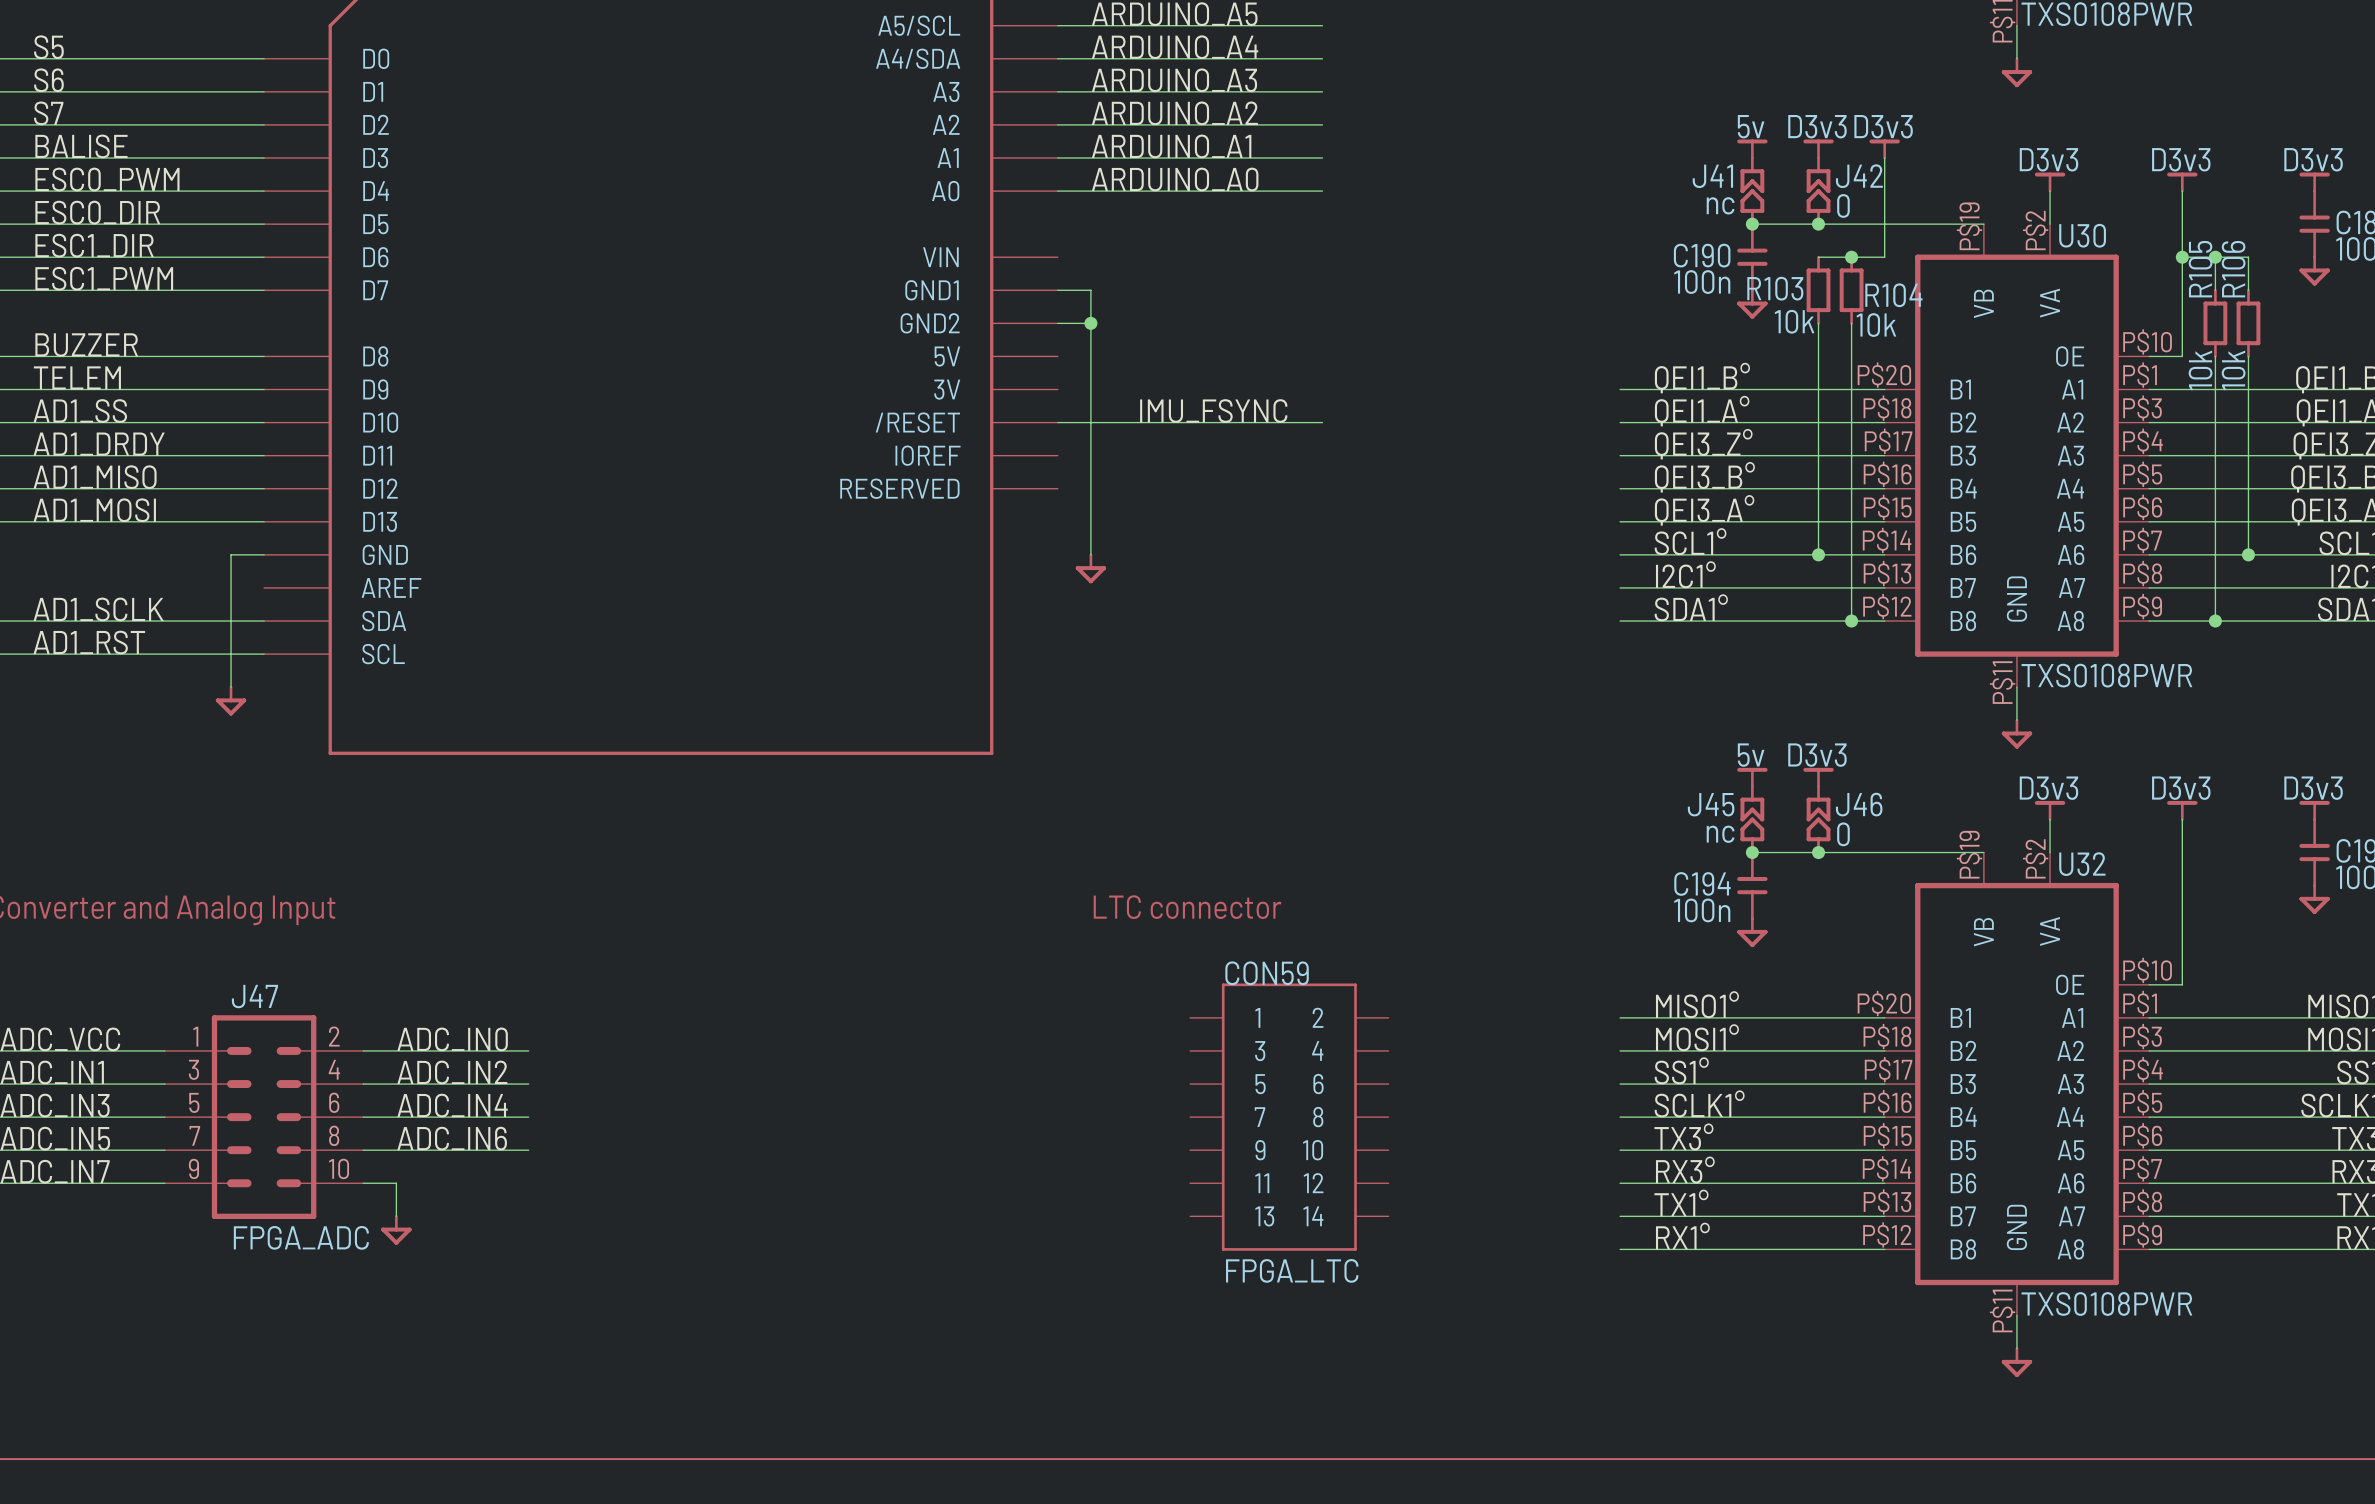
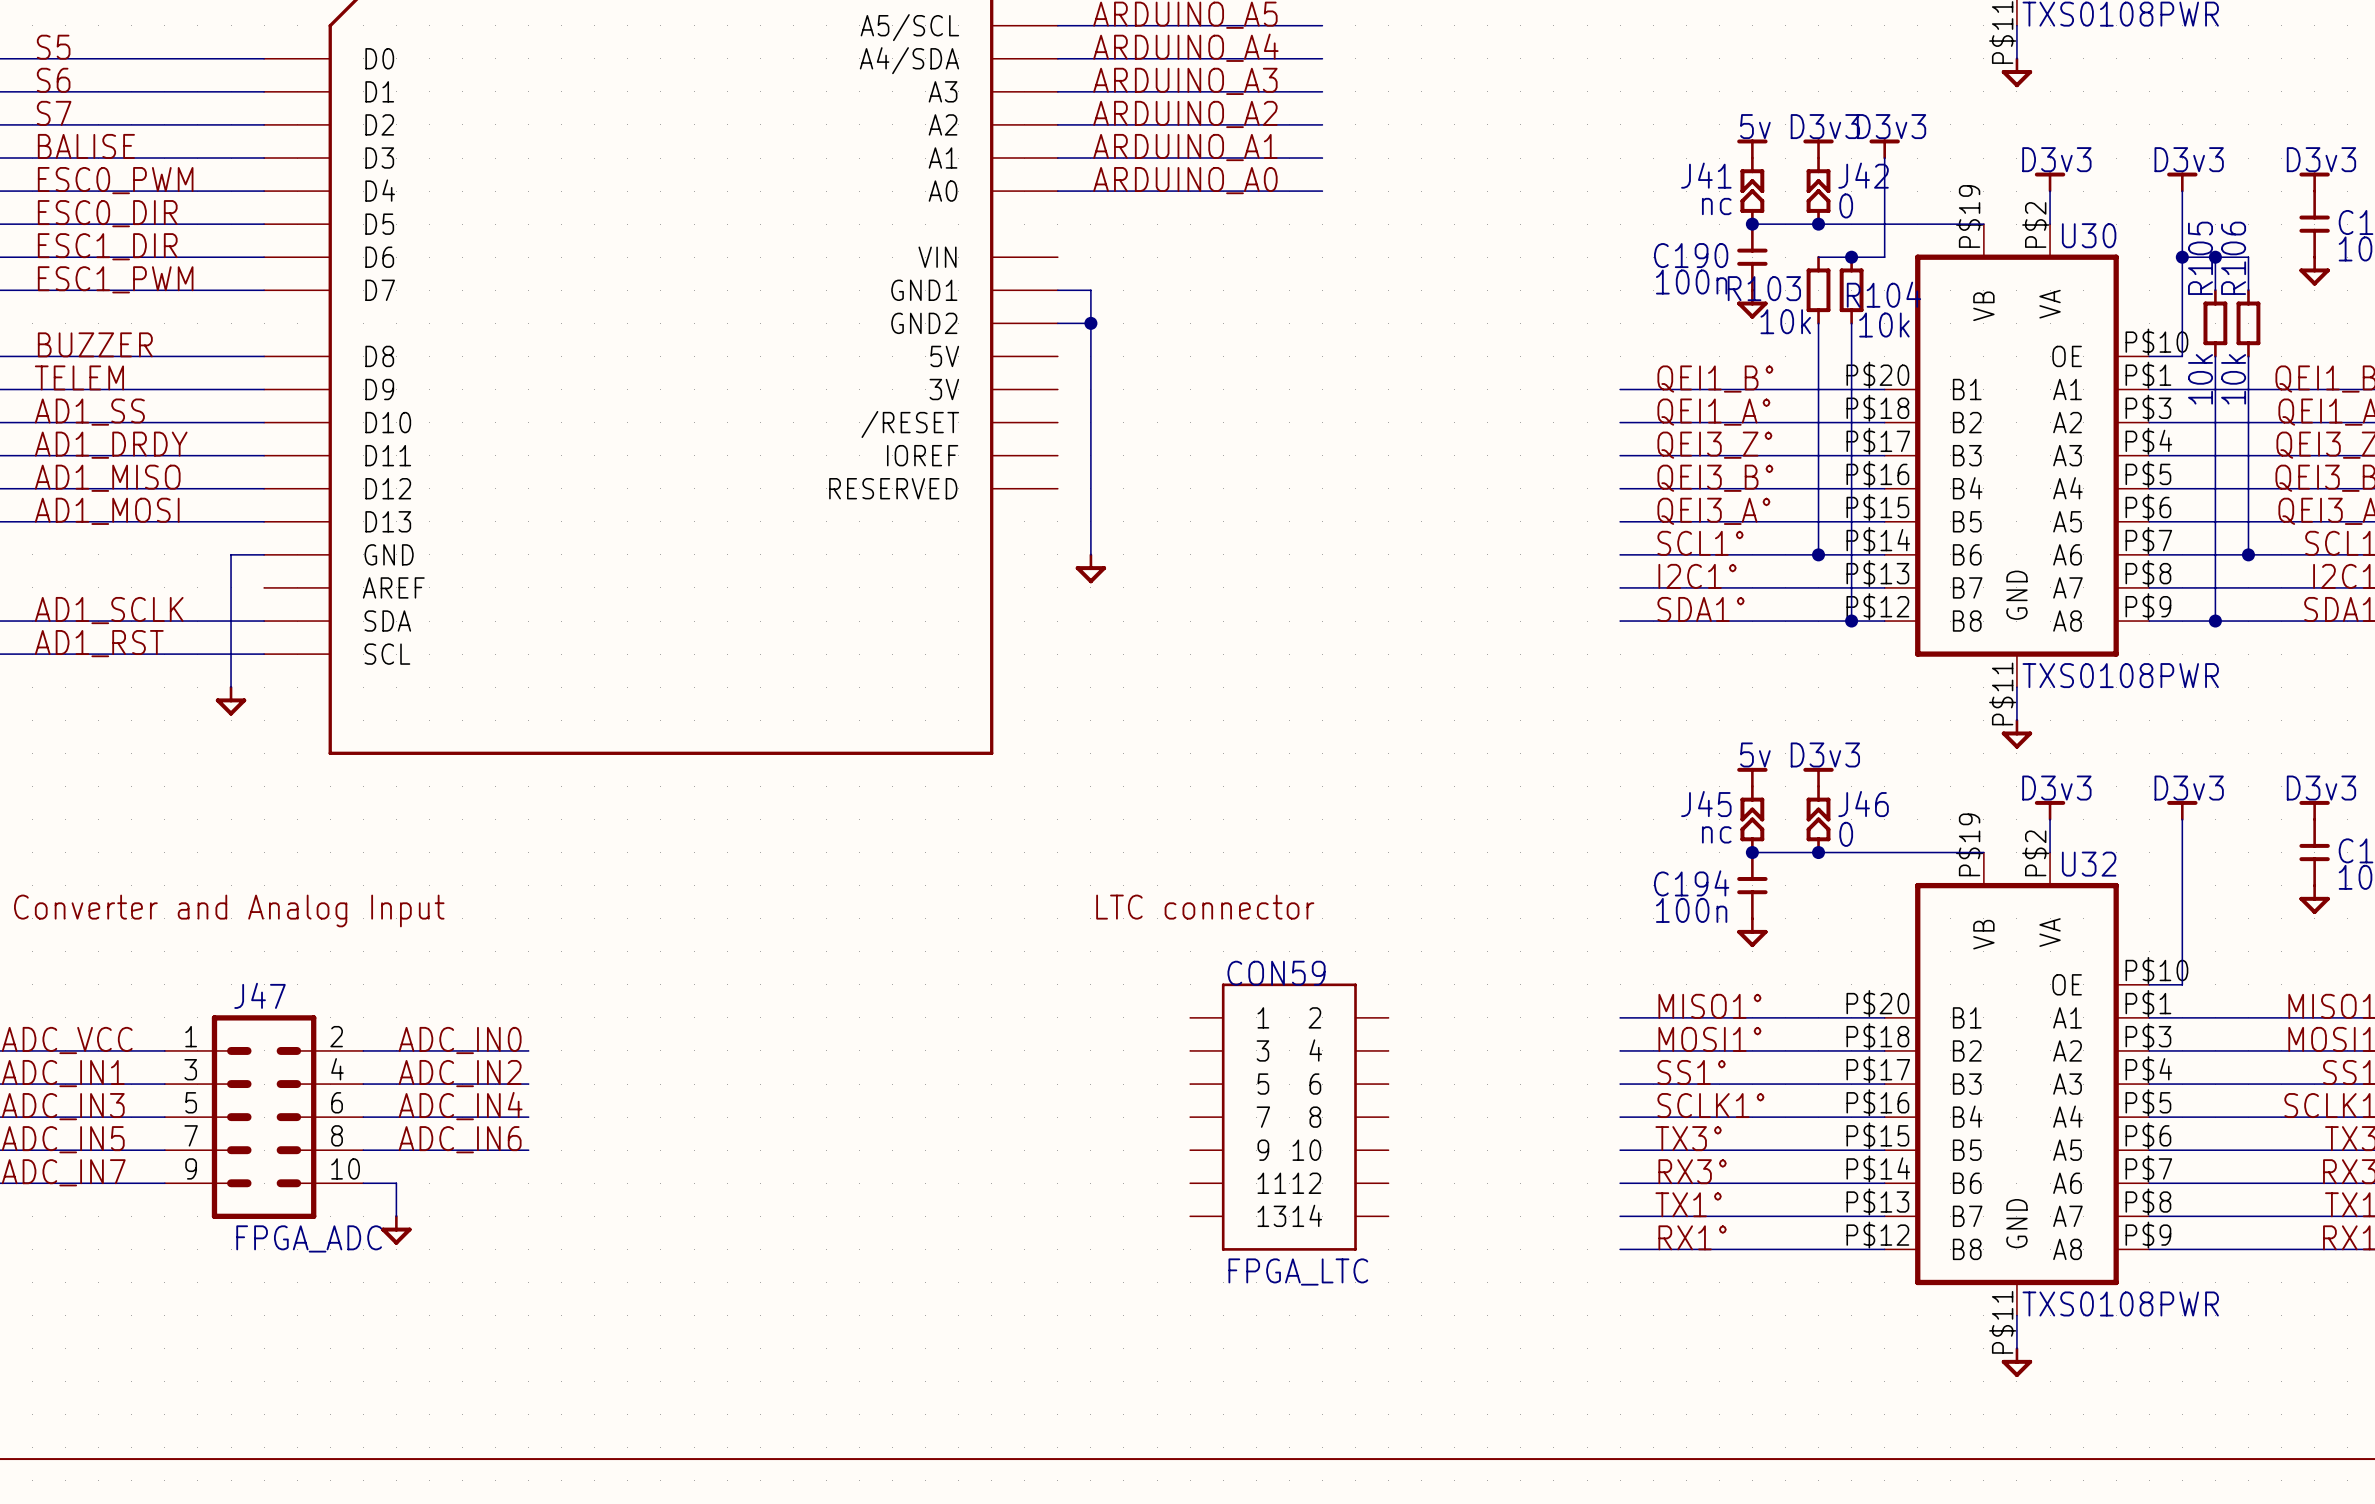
label: IMU_FSYNC (1213, 411) -> none
wire: (1057, 422) (1322, 422) -> none

